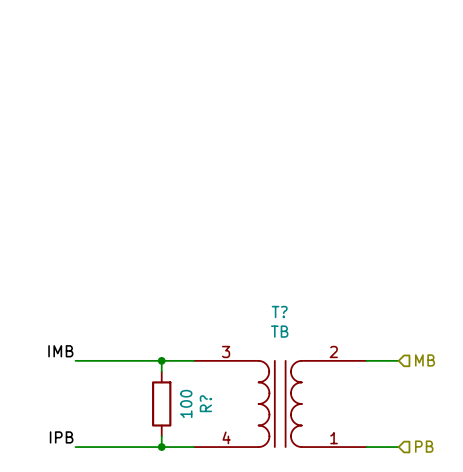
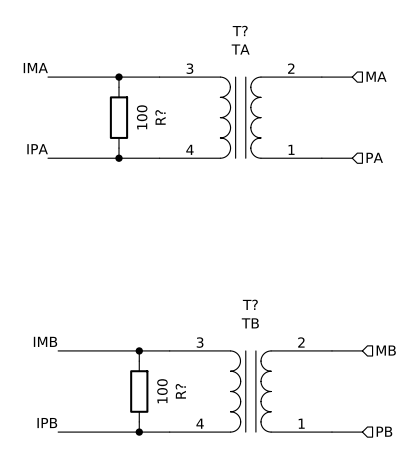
label: none -> IMA (35, 68)
hierarchical label: none -> MA (376, 76)
wire: none -> (47, 77) (159, 77)
wire: none -> (118, 77) (118, 87)
junction: none -> (118, 77)
wire: none -> (321, 77) (352, 77)
R?: none -> 100 (118, 117)
T?: none -> TA (240, 117)
wire: none -> (118, 148) (118, 158)
label: none -> IPA (37, 149)
hierarchical label: none -> PA (374, 157)
wire: none -> (47, 158) (159, 158)
junction: none -> (118, 158)
wire: none -> (321, 158) (352, 158)

